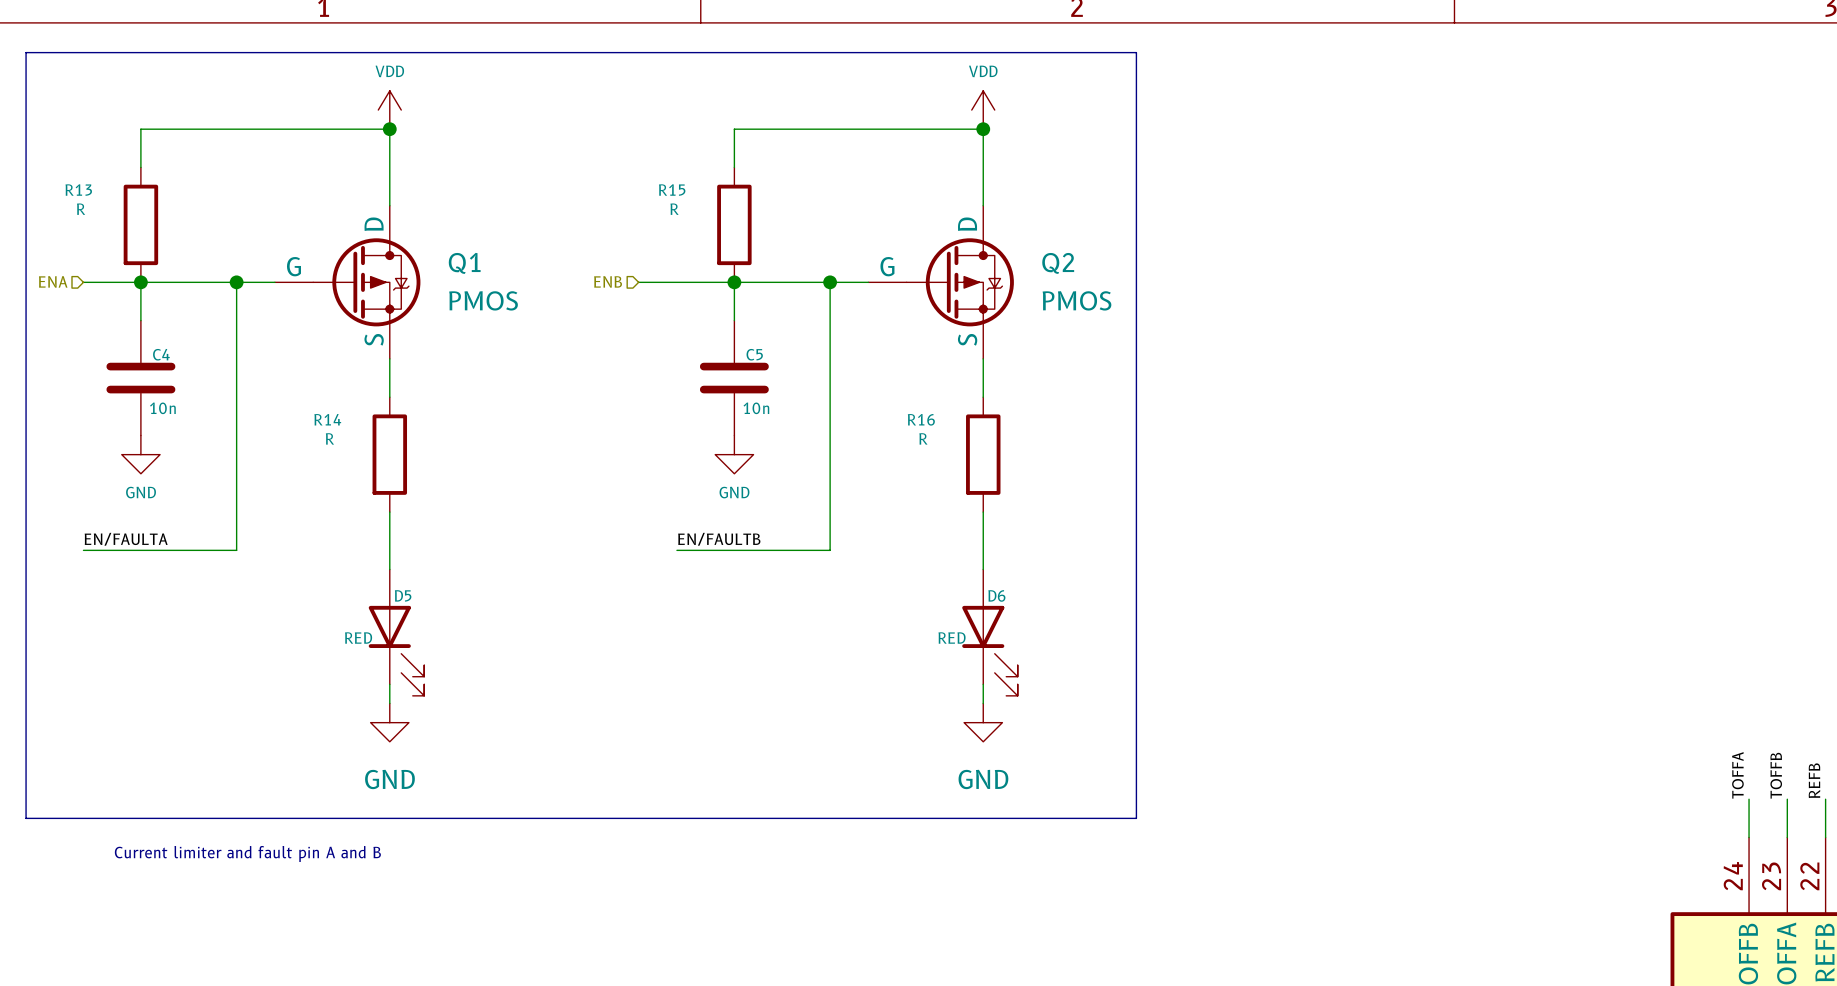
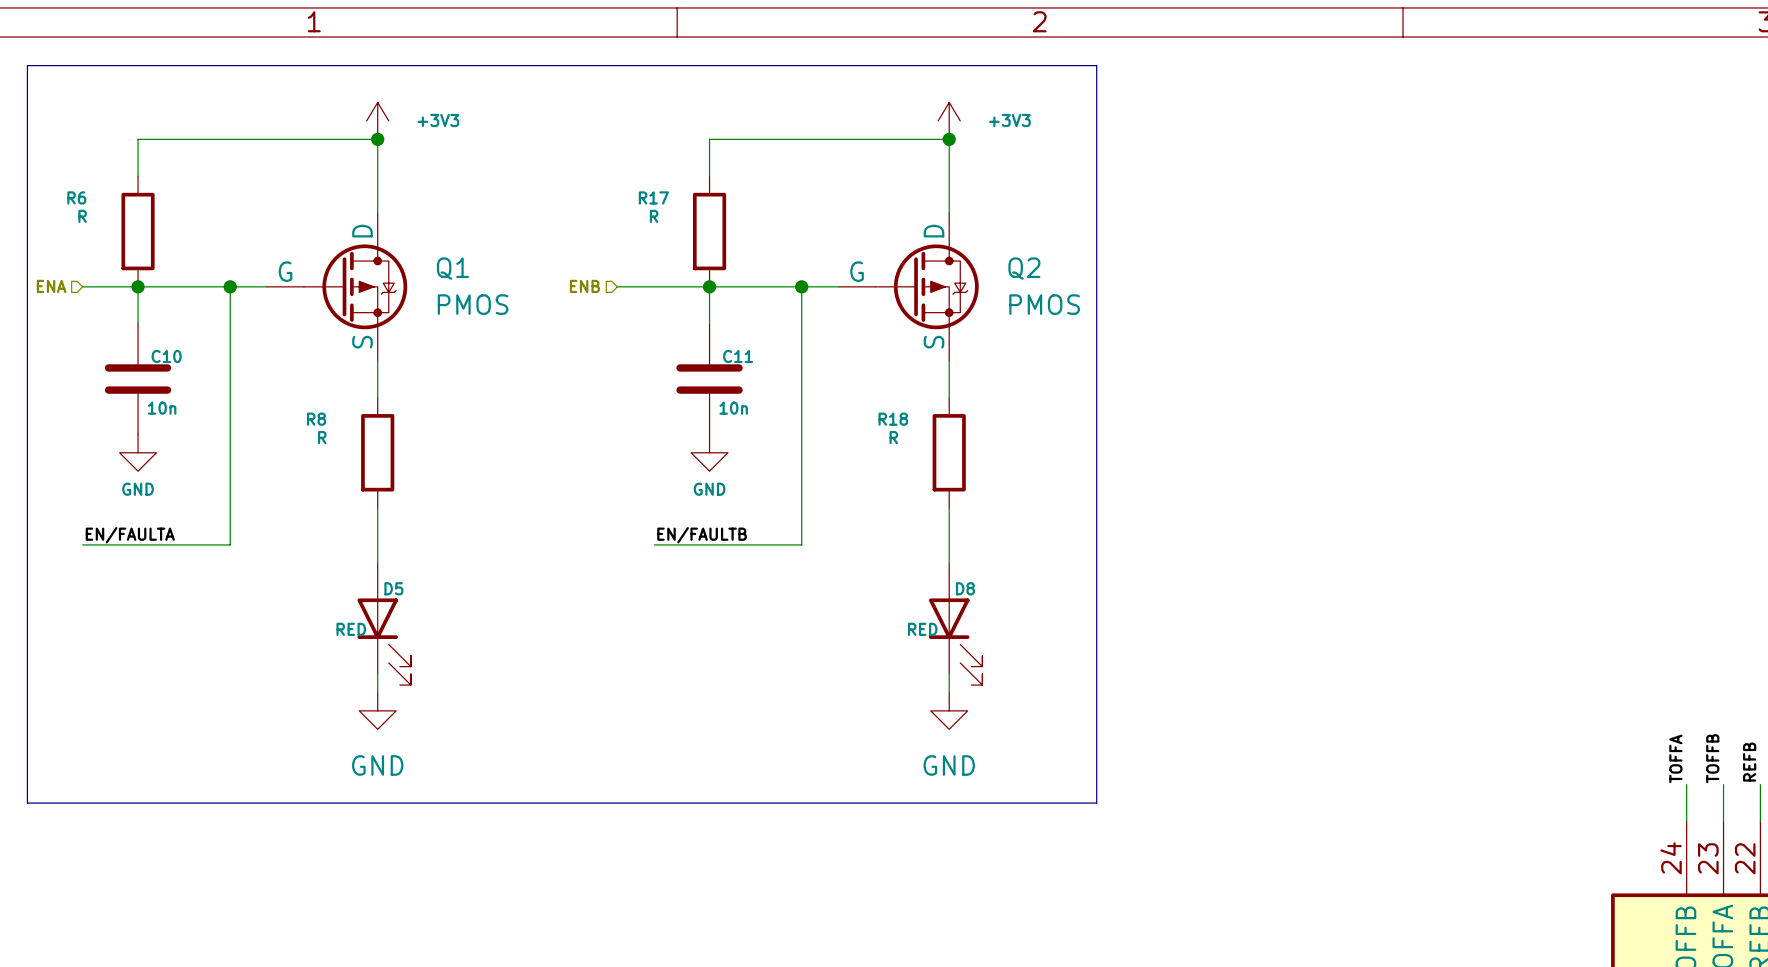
power symbol: VDD (389, 110) -> +3V3 (377, 120)
power symbol: VDD (983, 110) -> +3V3 (949, 120)
R13 name: R13 (78, 190) -> R6 (76, 197)
R15 name: R15 (672, 190) -> R17 (653, 197)
C4 name: C4 (161, 354) -> C10 (166, 356)
C5 name: C5 (754, 354) -> C11 (738, 356)
R14 name: R14 (327, 419) -> R8 (316, 419)
R16 name: R16 (921, 419) -> R18 (893, 419)
D6 name: D6 (996, 595) -> D8 (965, 588)
text: Current limiter and fault pin A and B (247, 853) -> none

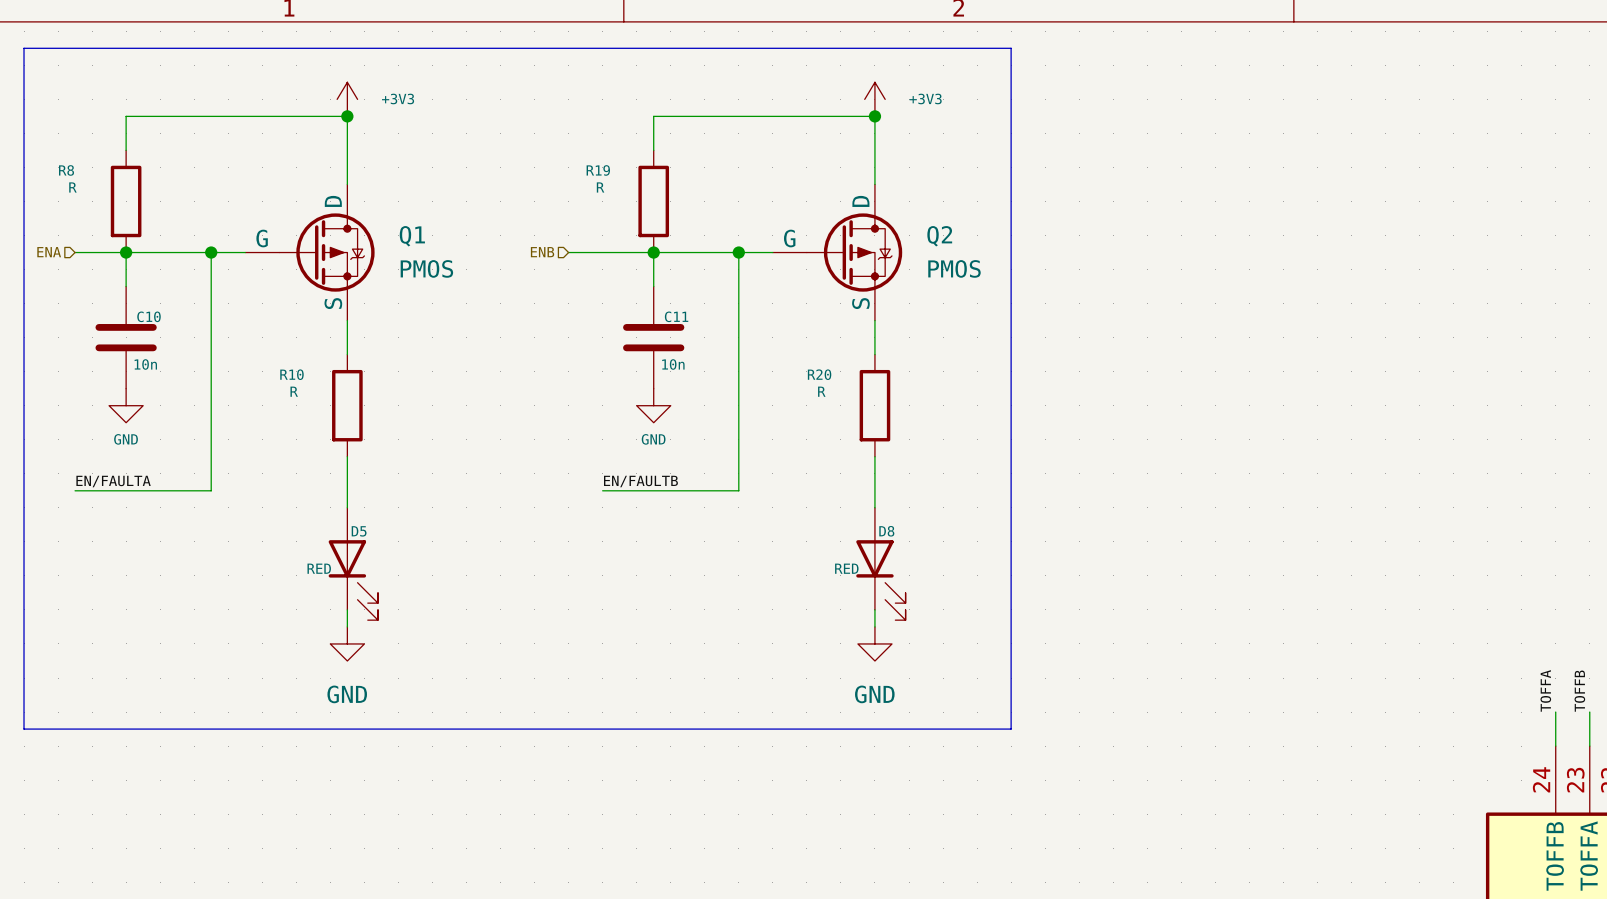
R6 name: R6 (76, 197) -> R8 (66, 170)
R17 name: R17 (653, 197) -> R19 (598, 170)
R8 name: R8 (316, 419) -> R10 (291, 374)
R18 name: R18 (893, 419) -> R20 (819, 374)

